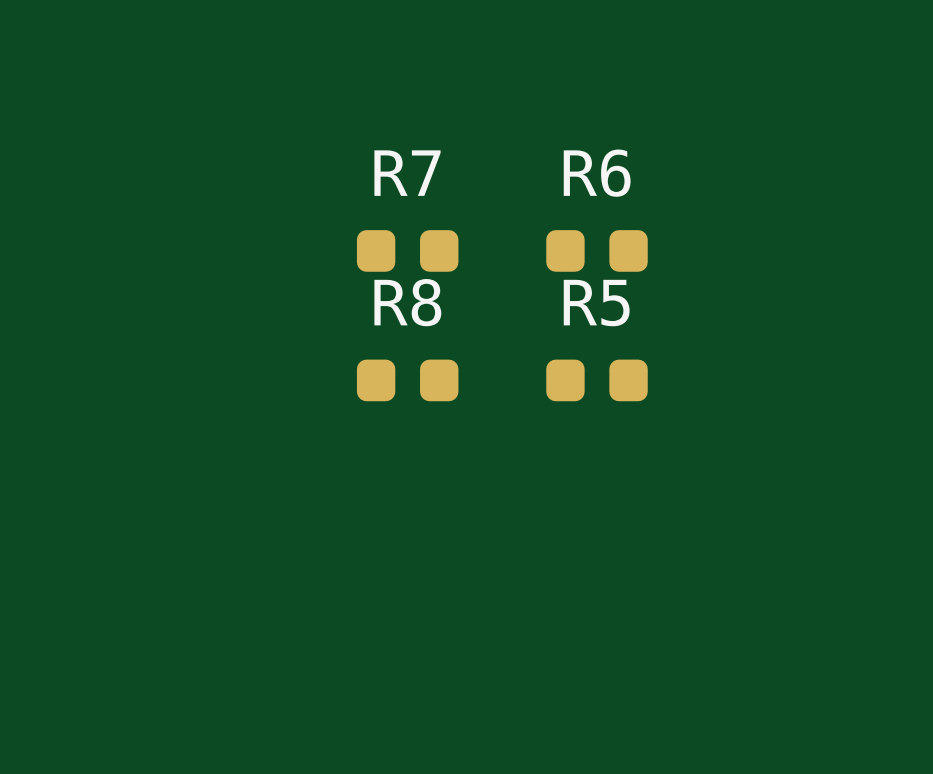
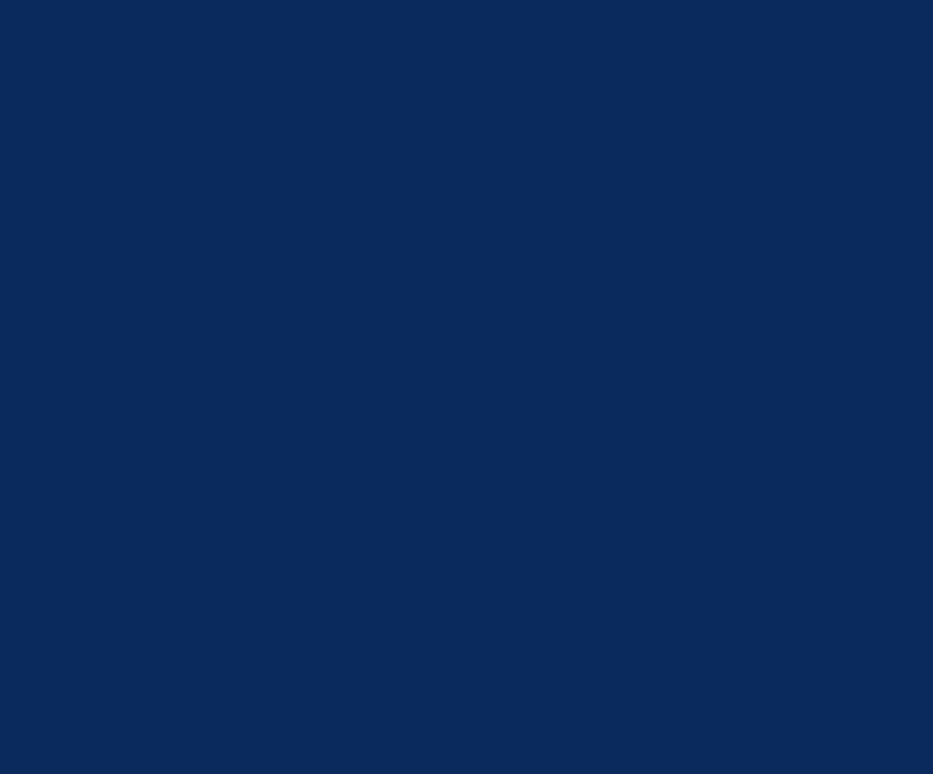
R7: (407, 250) -> none
R6: (597, 250) -> none
R8: (407, 380) -> none
R5: (597, 380) -> none

